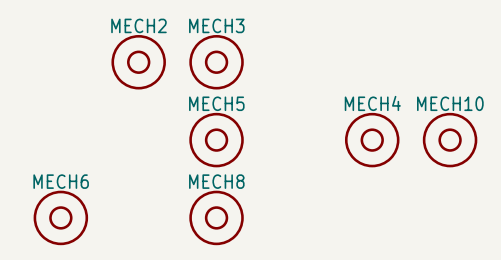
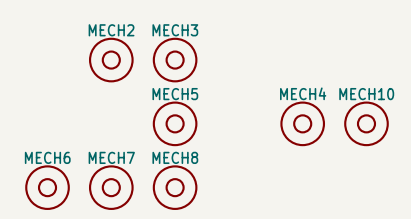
MECH7: none -> (111, 187)

